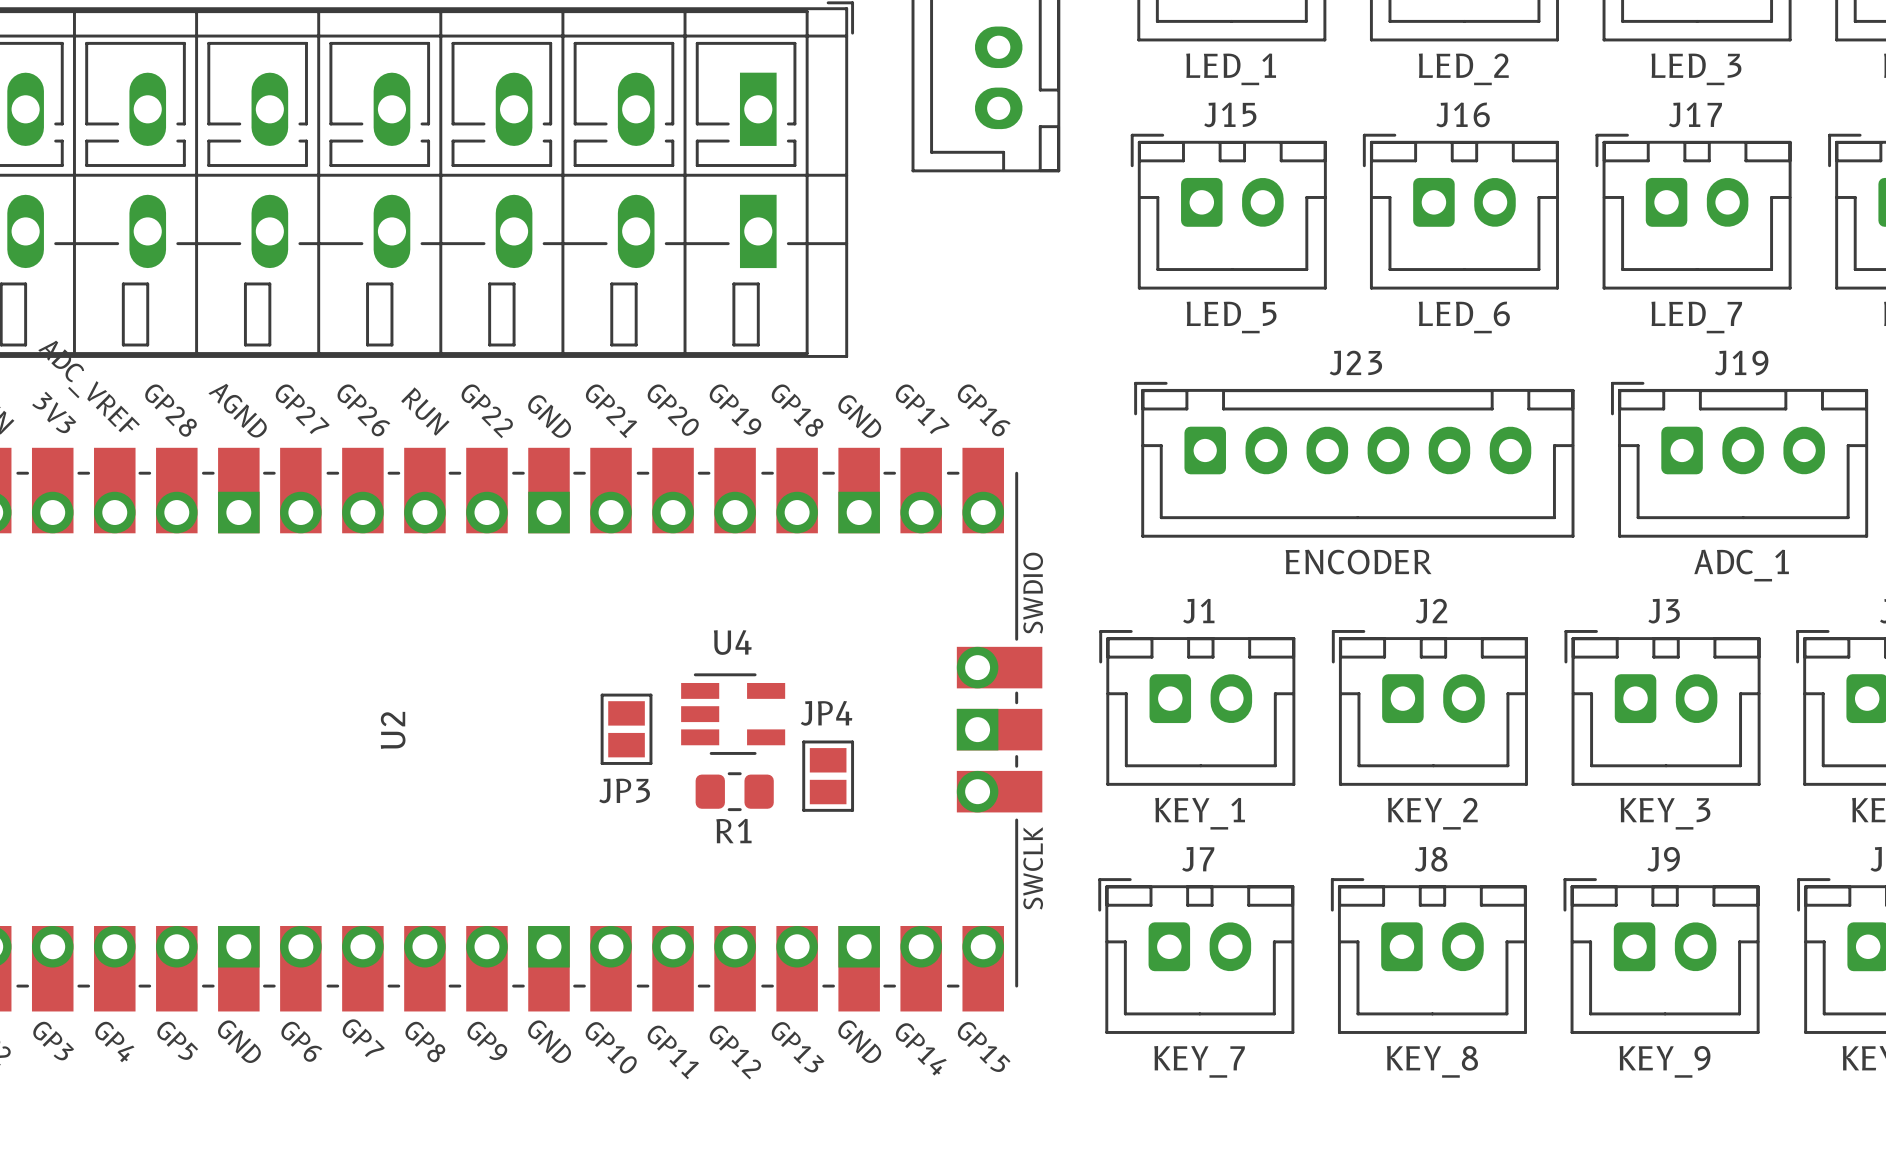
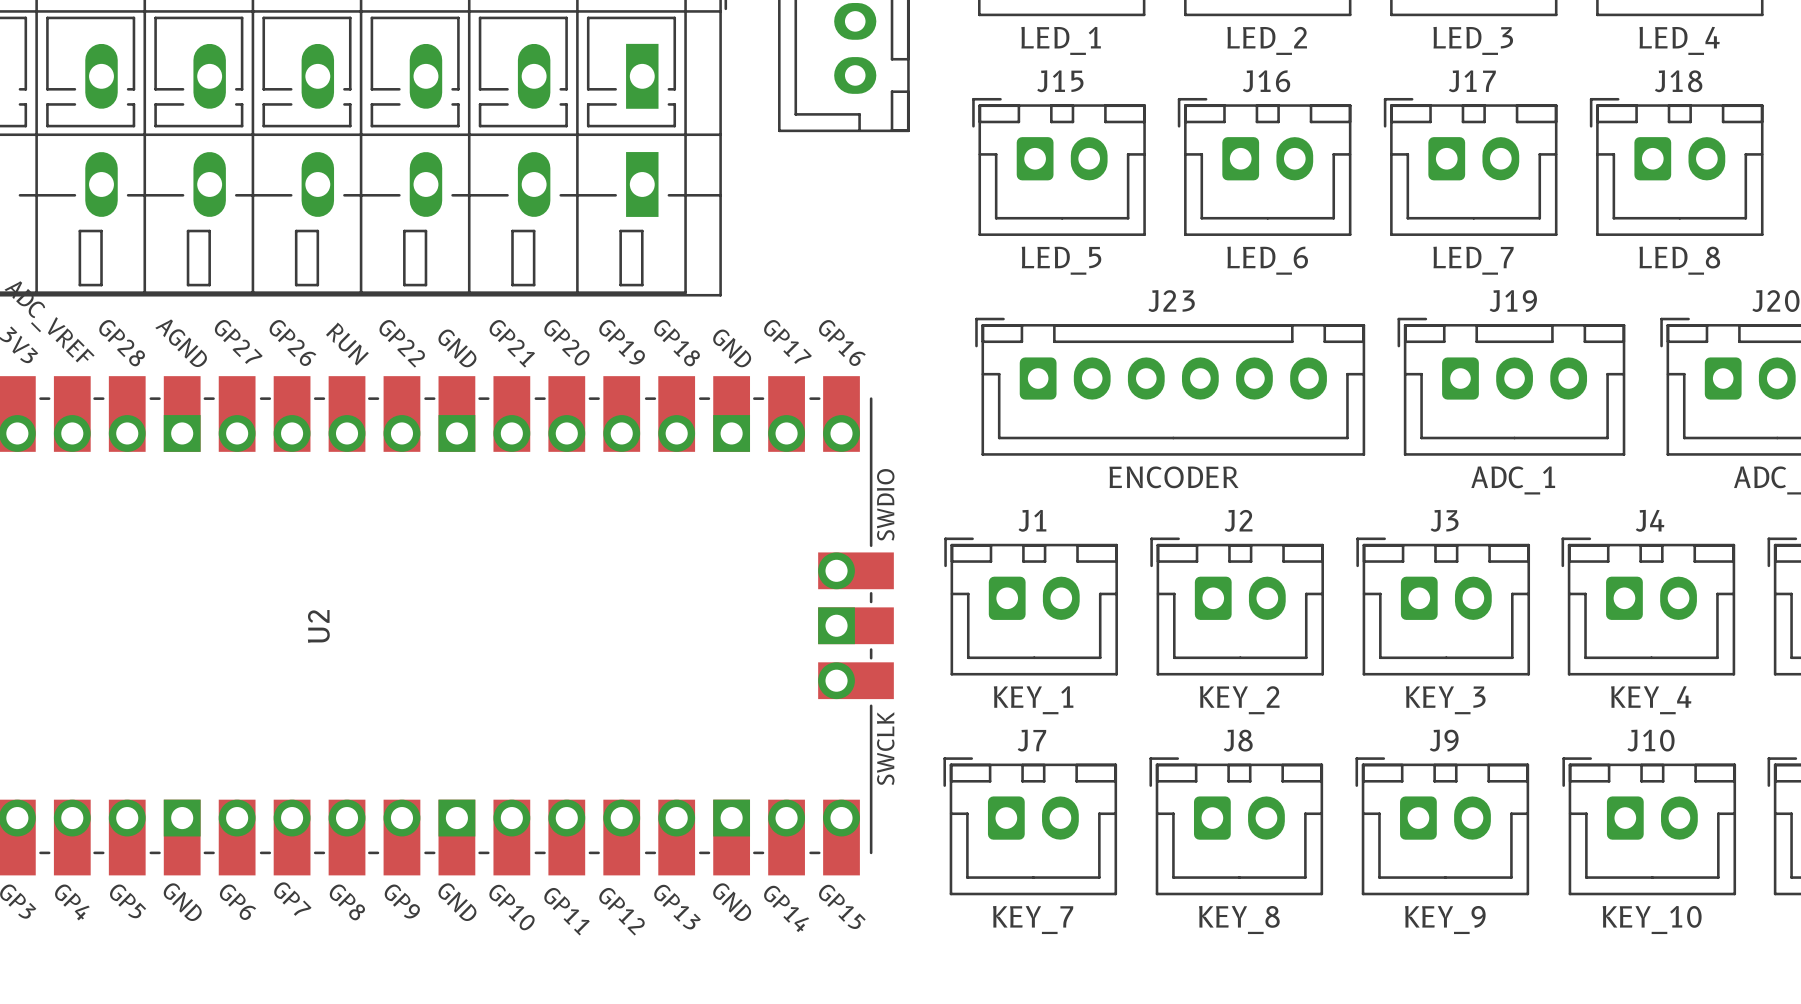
U4: (733, 714) -> none
JP3: (626, 729) -> none
JP4: (828, 776) -> none
R1: (734, 791) -> none

